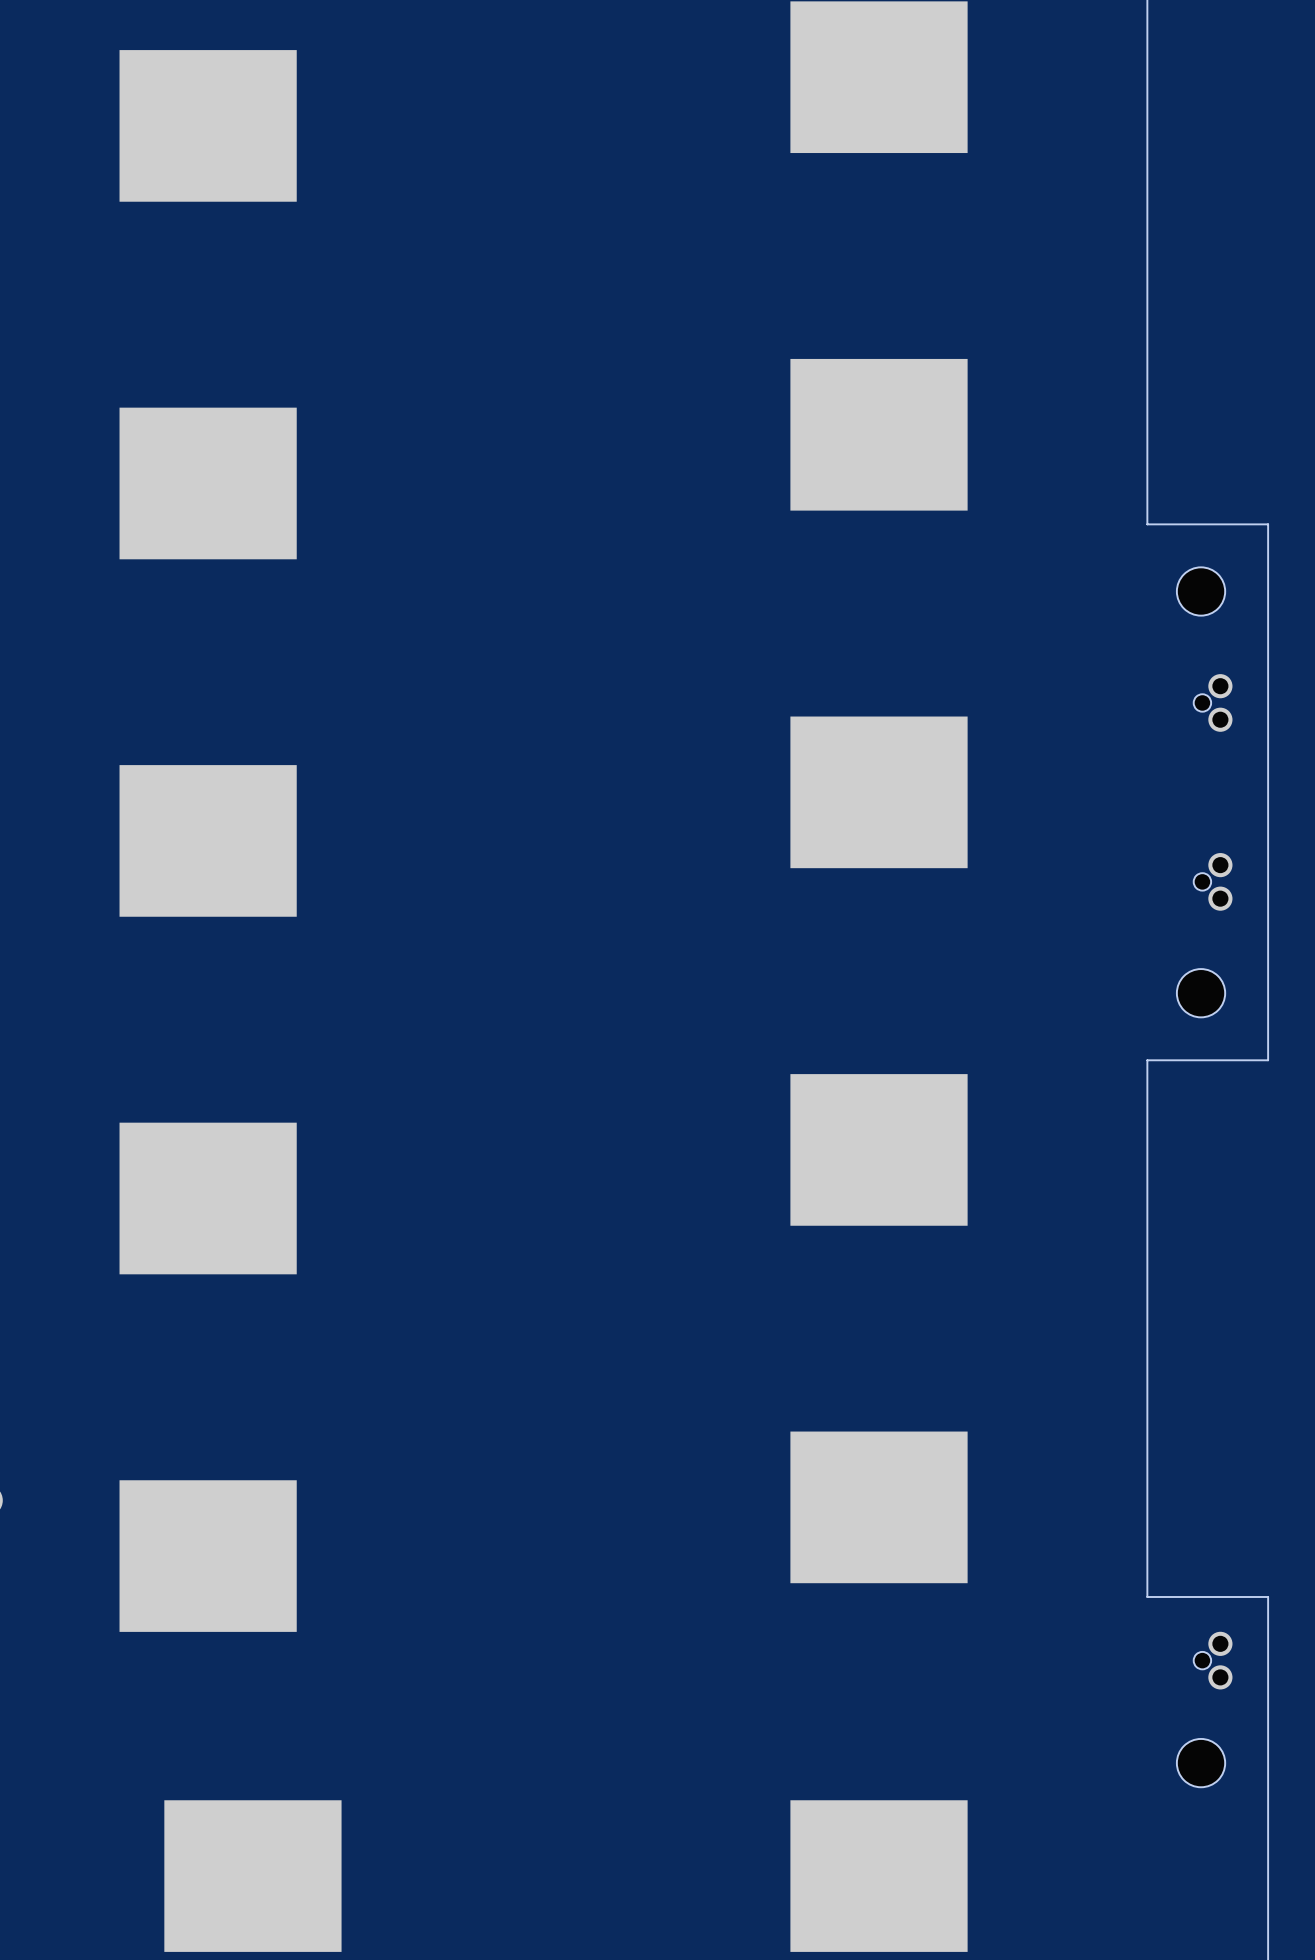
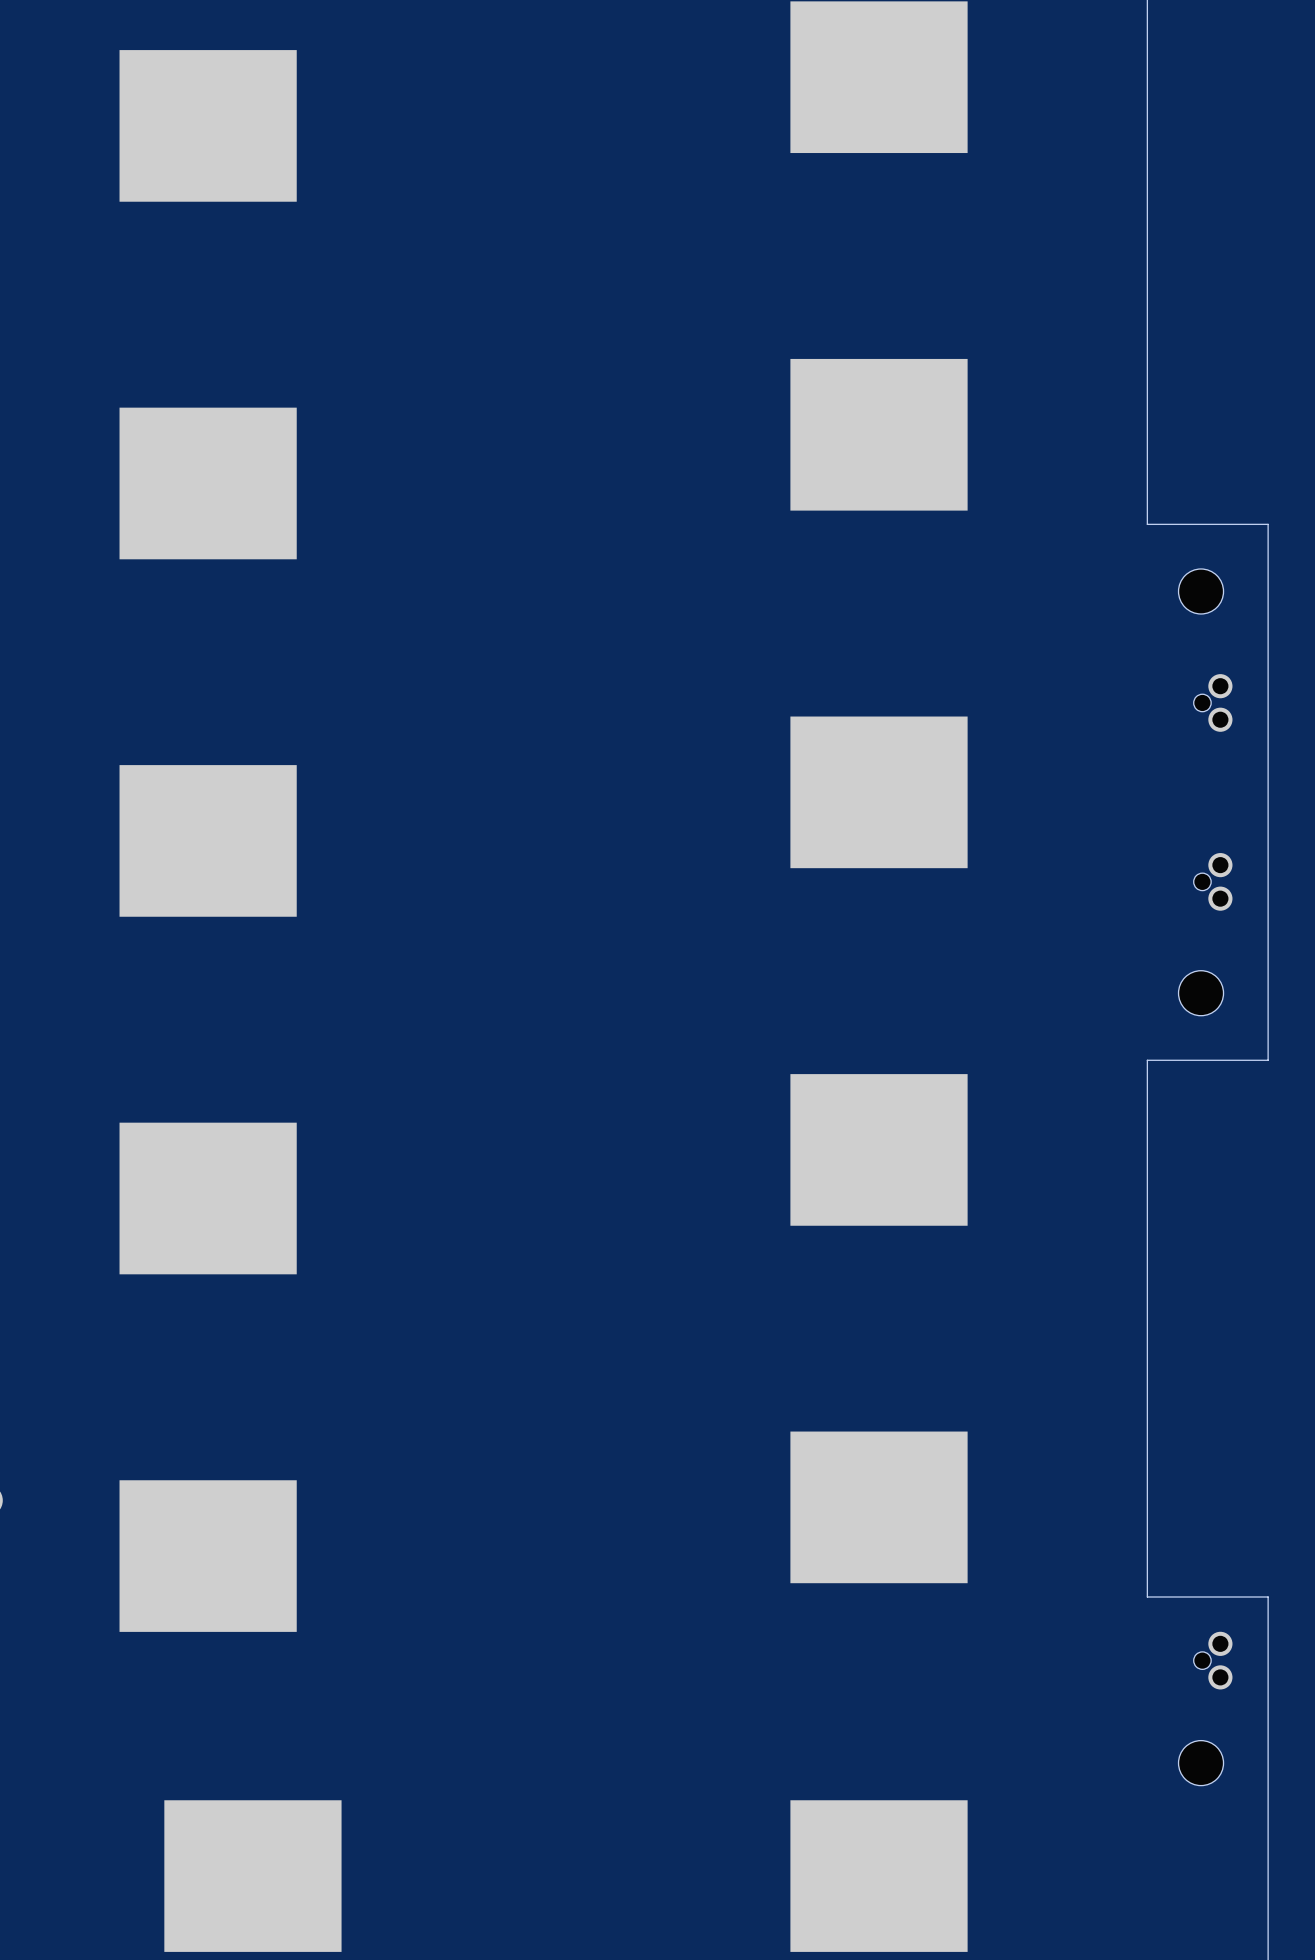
hole: (1201, 591) -> none
part: none -> (1201, 591)
hole: (1201, 993) -> none
part: none -> (1201, 993)
hole: (1201, 1763) -> none
part: none -> (1201, 1763)

